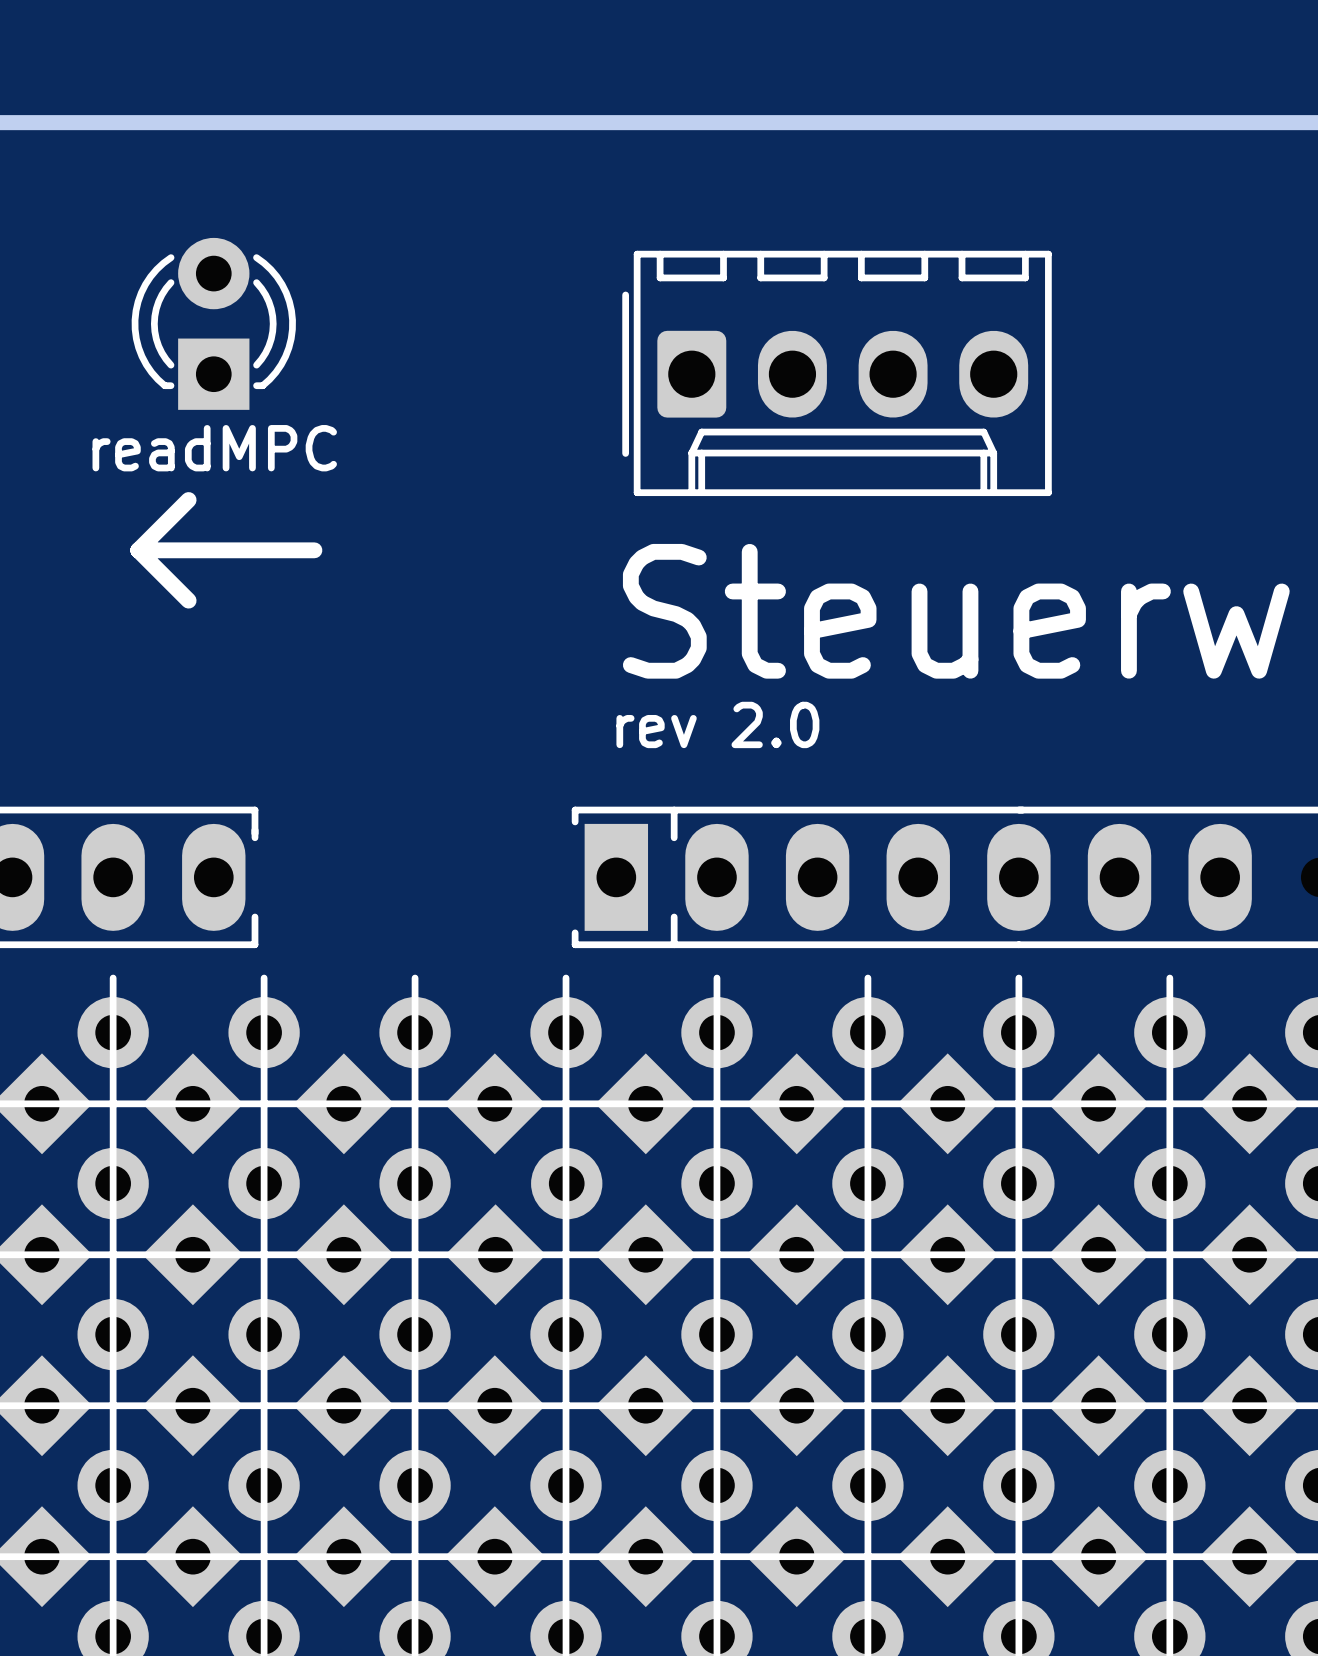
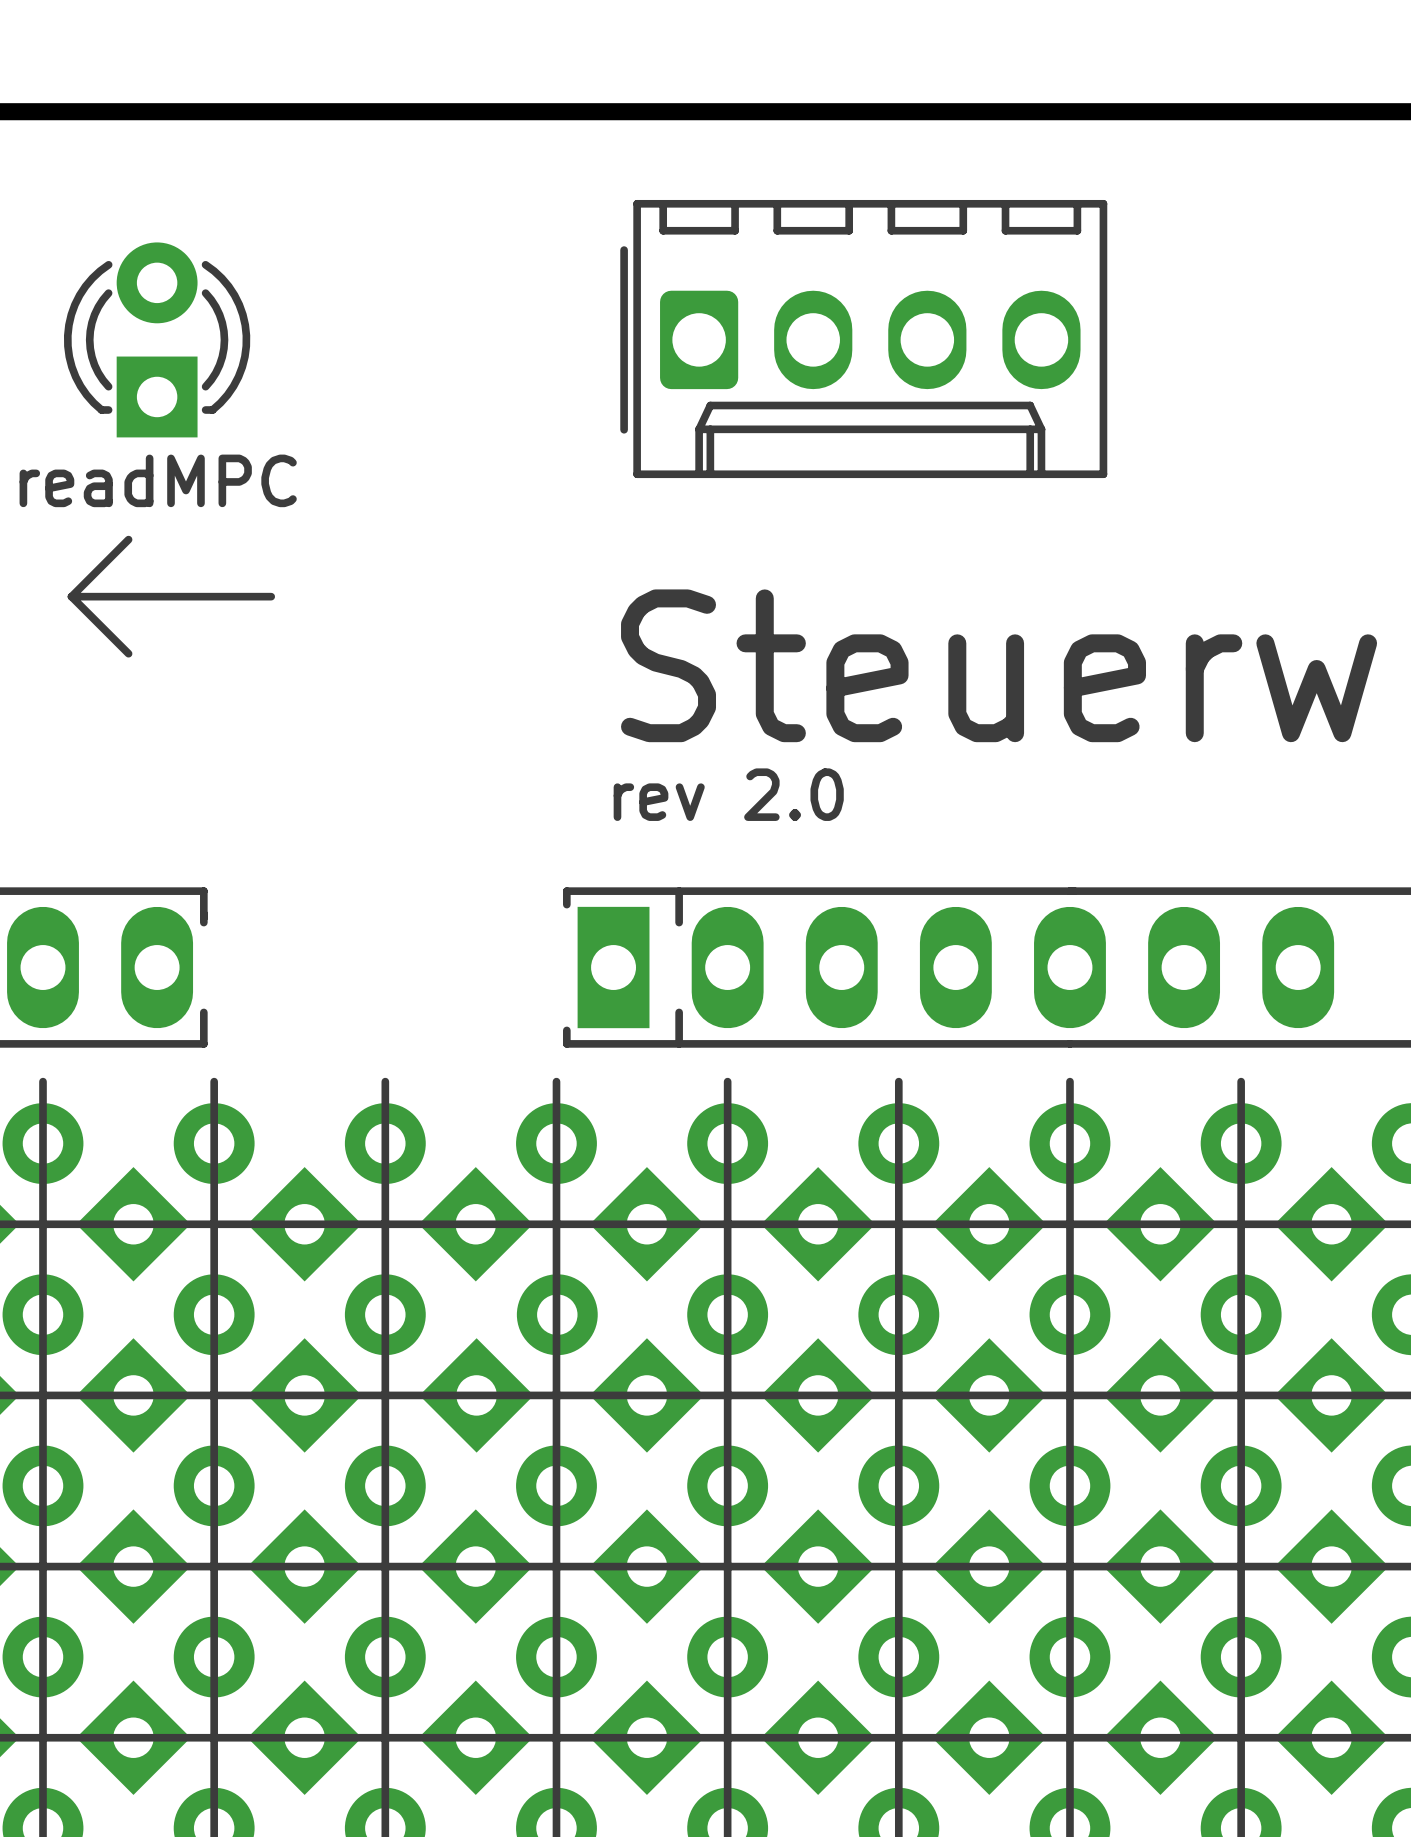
part position: (837, 373) -> (863, 339)
line width: thick (188, 500) (138, 550) -> thin (128, 539) (71, 596)
line width: thick (138, 550) (188, 600) -> thin (71, 596) (128, 653)
line width: thick (138, 550) (314, 550) -> thin (71, 596) (271, 596)

